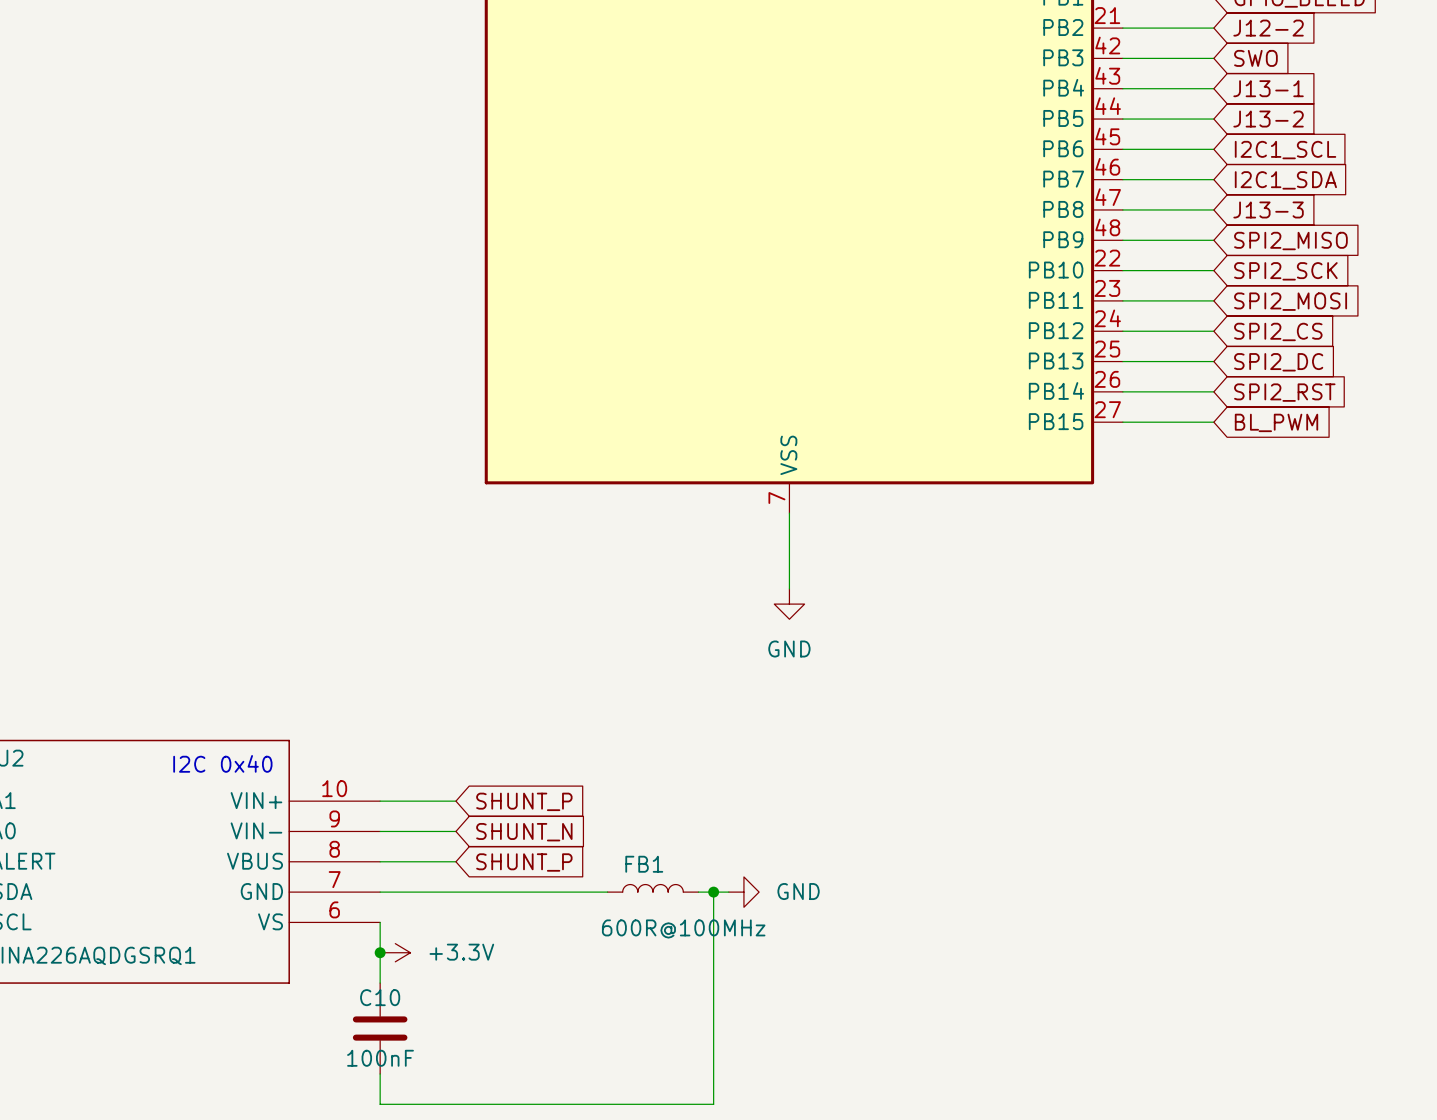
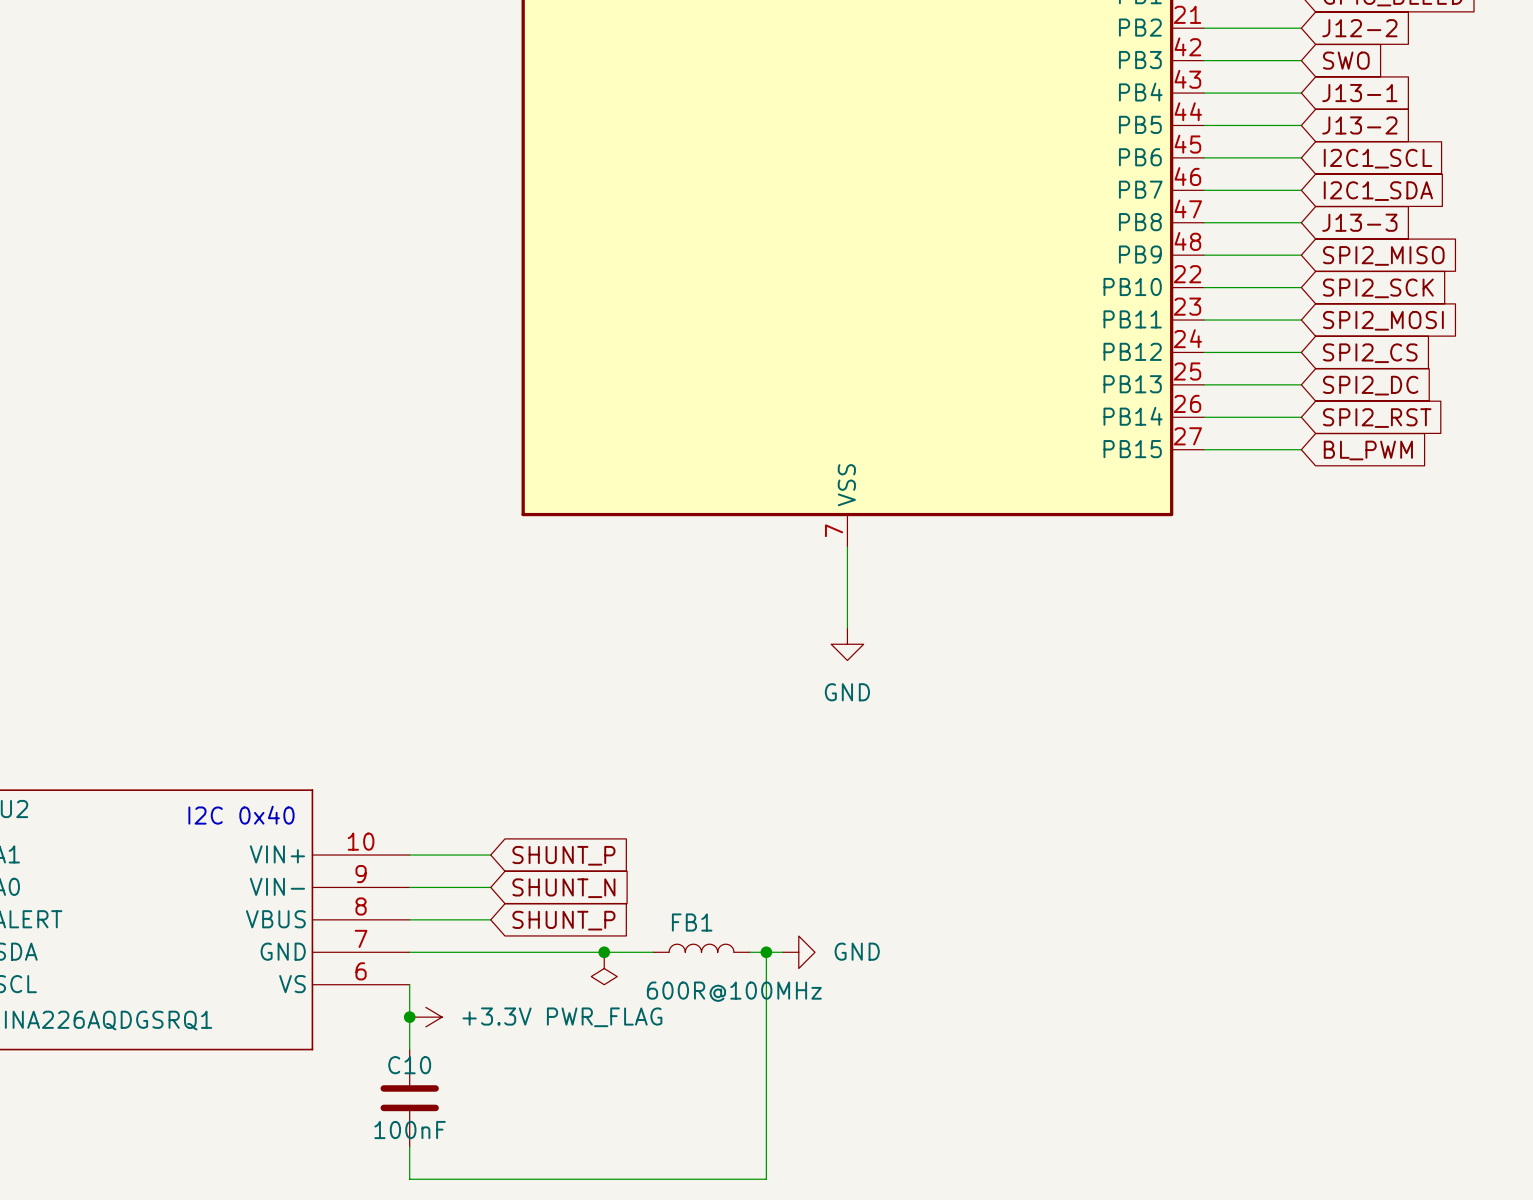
junction: none -> (604, 952)
power symbol: none -> PWR_FLAG (604, 968)

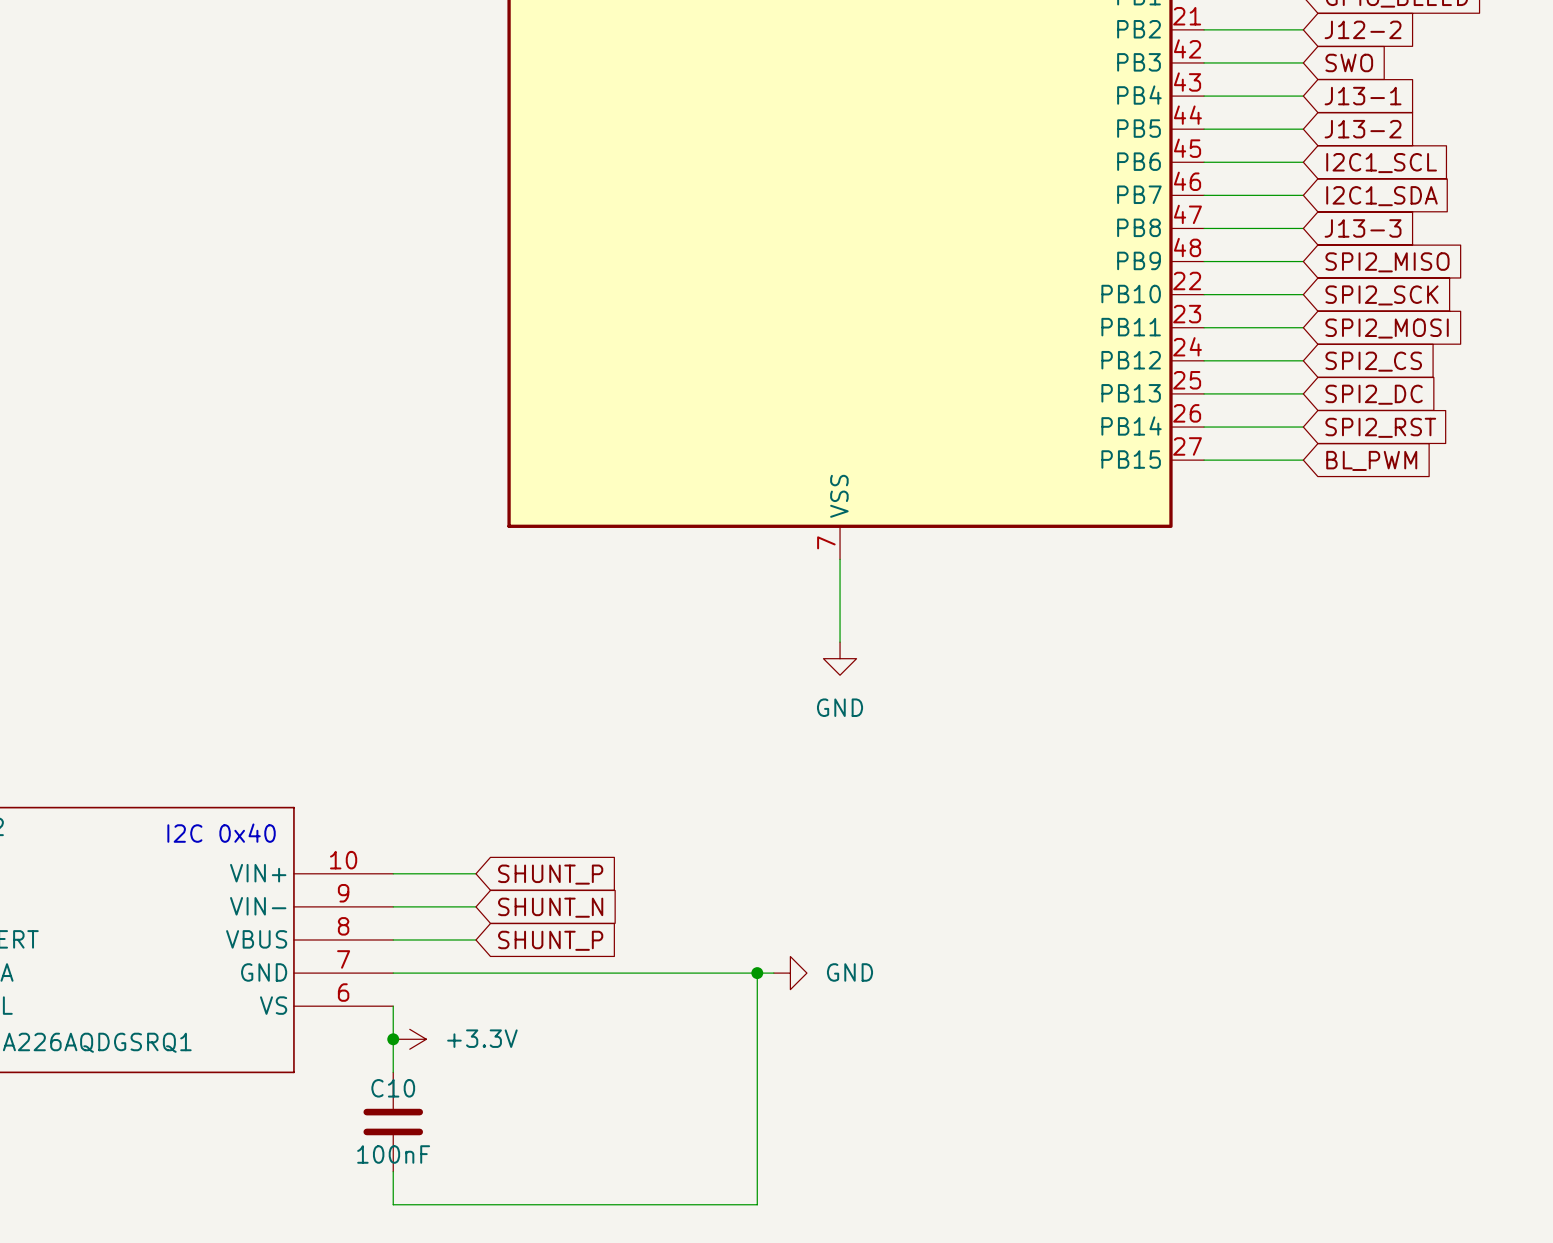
FB1: 600R@100MHz (701, 948) -> none
junction: (604, 952) -> none
wire: none -> (641, 973) (740, 973)
power symbol: PWR_FLAG (604, 968) -> none

